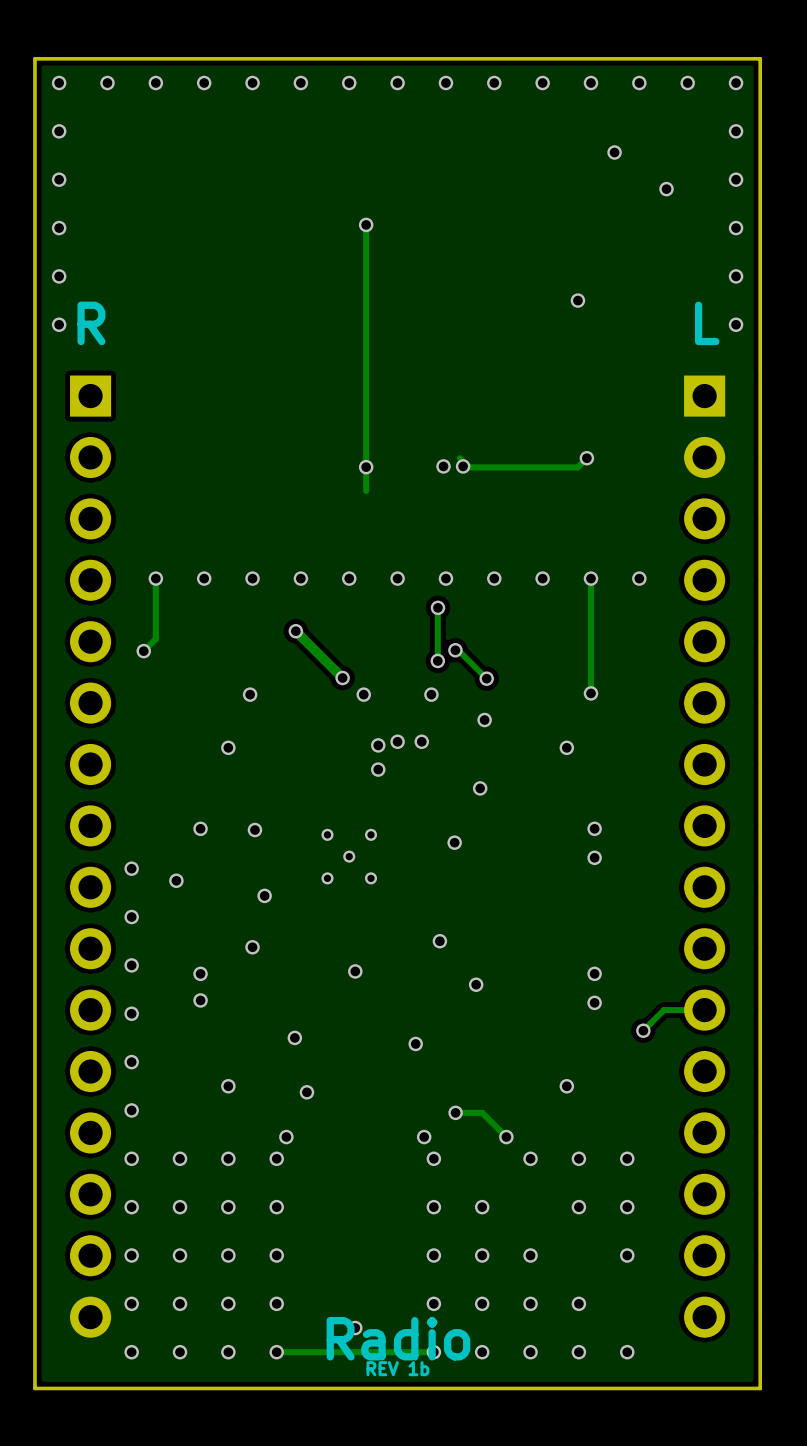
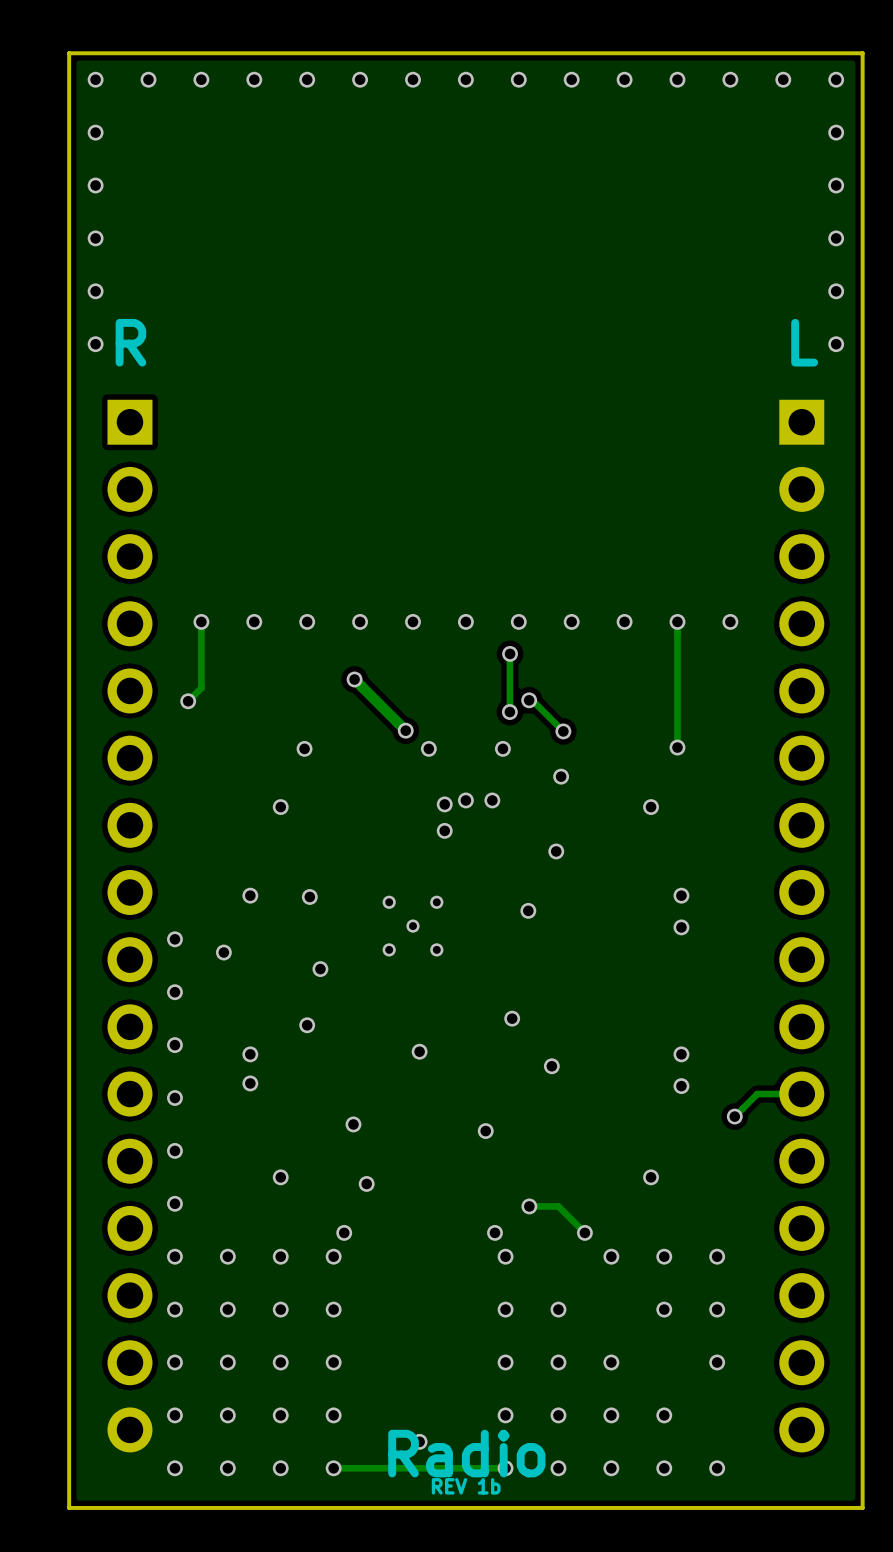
via: (614, 152) -> none
via: (666, 189) -> none
track: (366, 224) (366, 491) -> none
via: (366, 224) -> none
via: (577, 300) -> none
track: (586, 458) (577, 467) (469, 467) (459, 458) -> none
via: (586, 458) -> none
via: (443, 466) -> none
via: (463, 466) -> none
via: (366, 467) -> none

